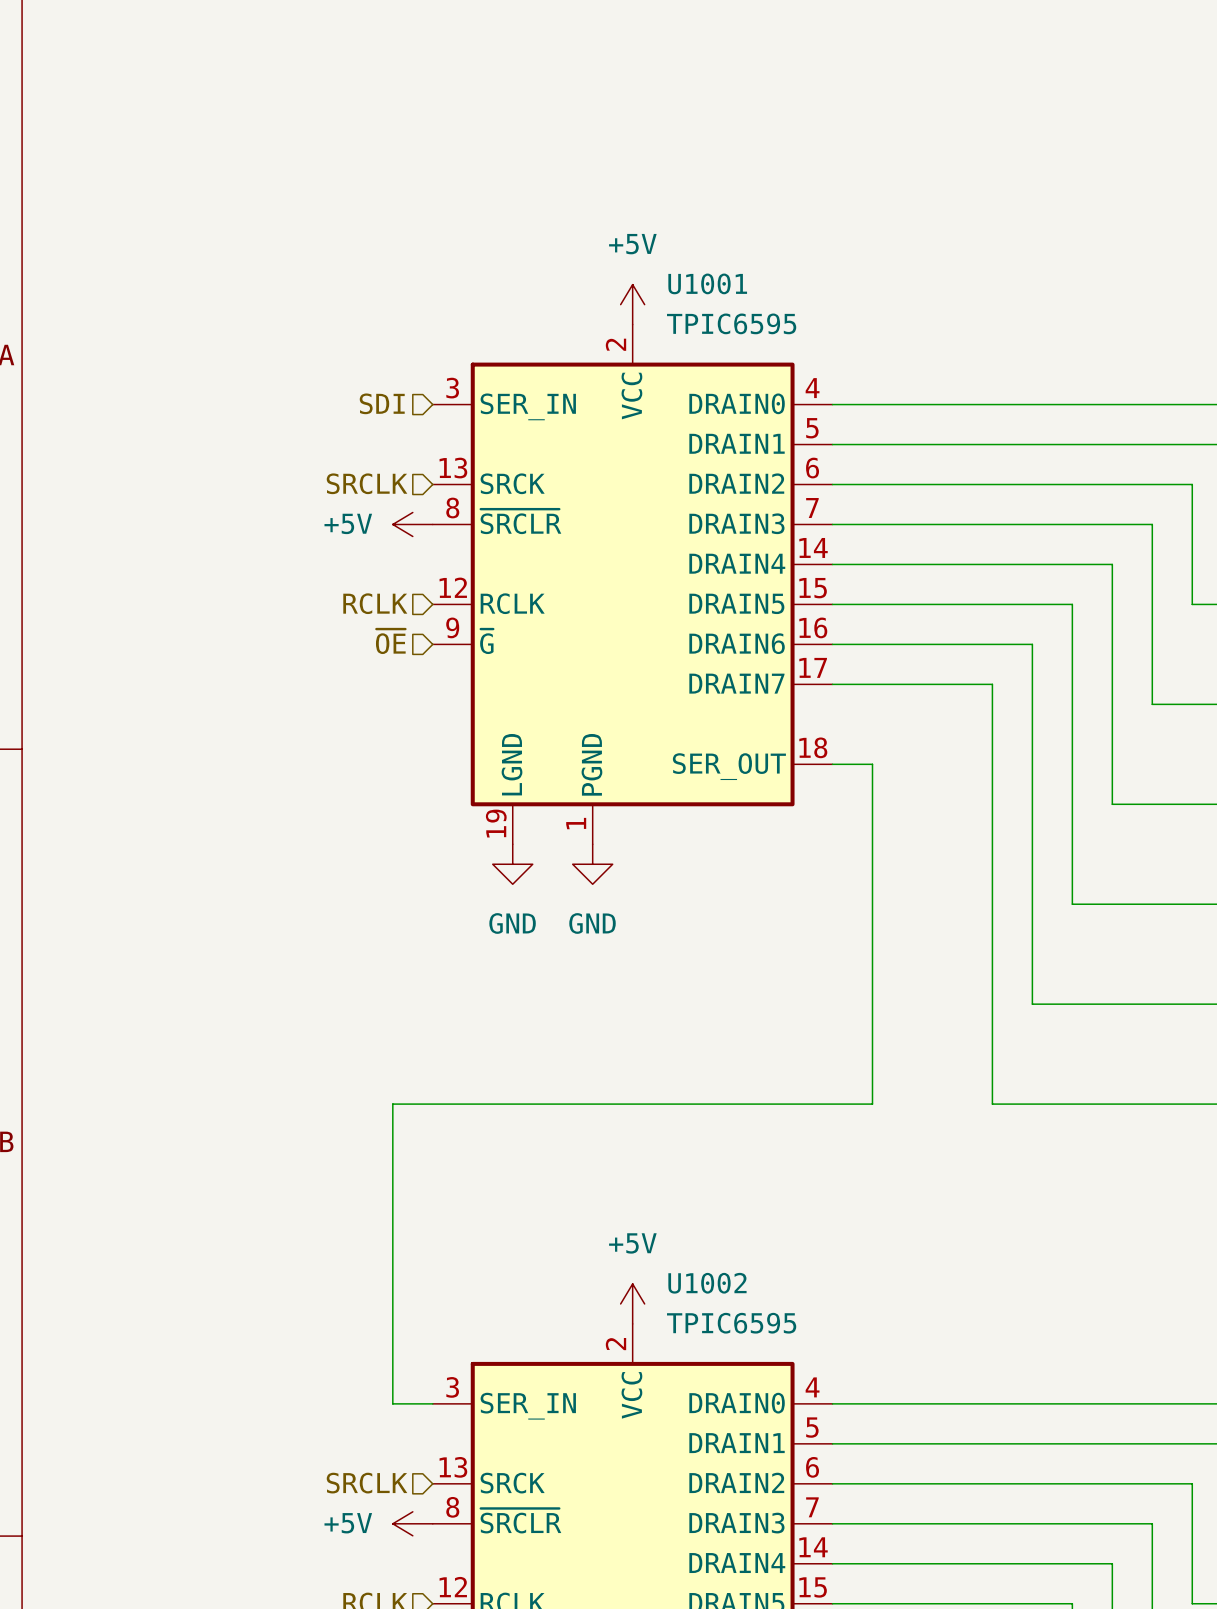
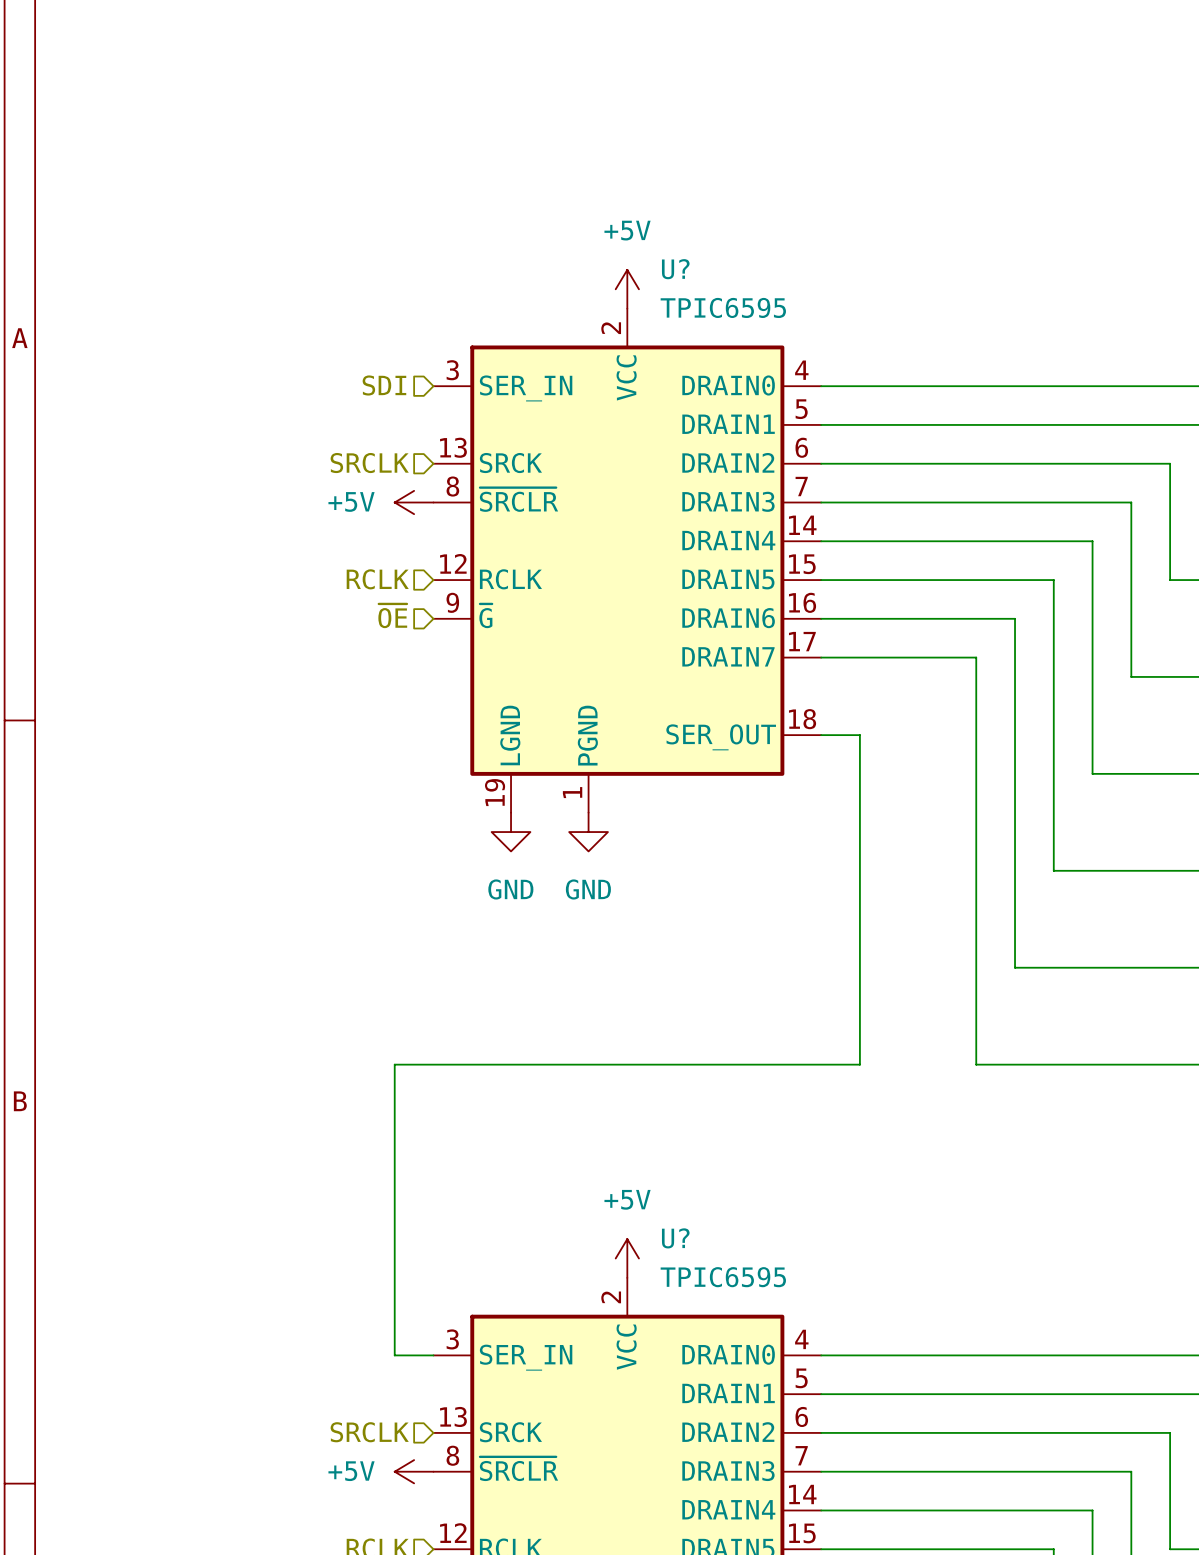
U1001 name: U1001 (707, 283) -> U? (675, 269)
U1002 name: U1002 (707, 1283) -> U? (675, 1238)

